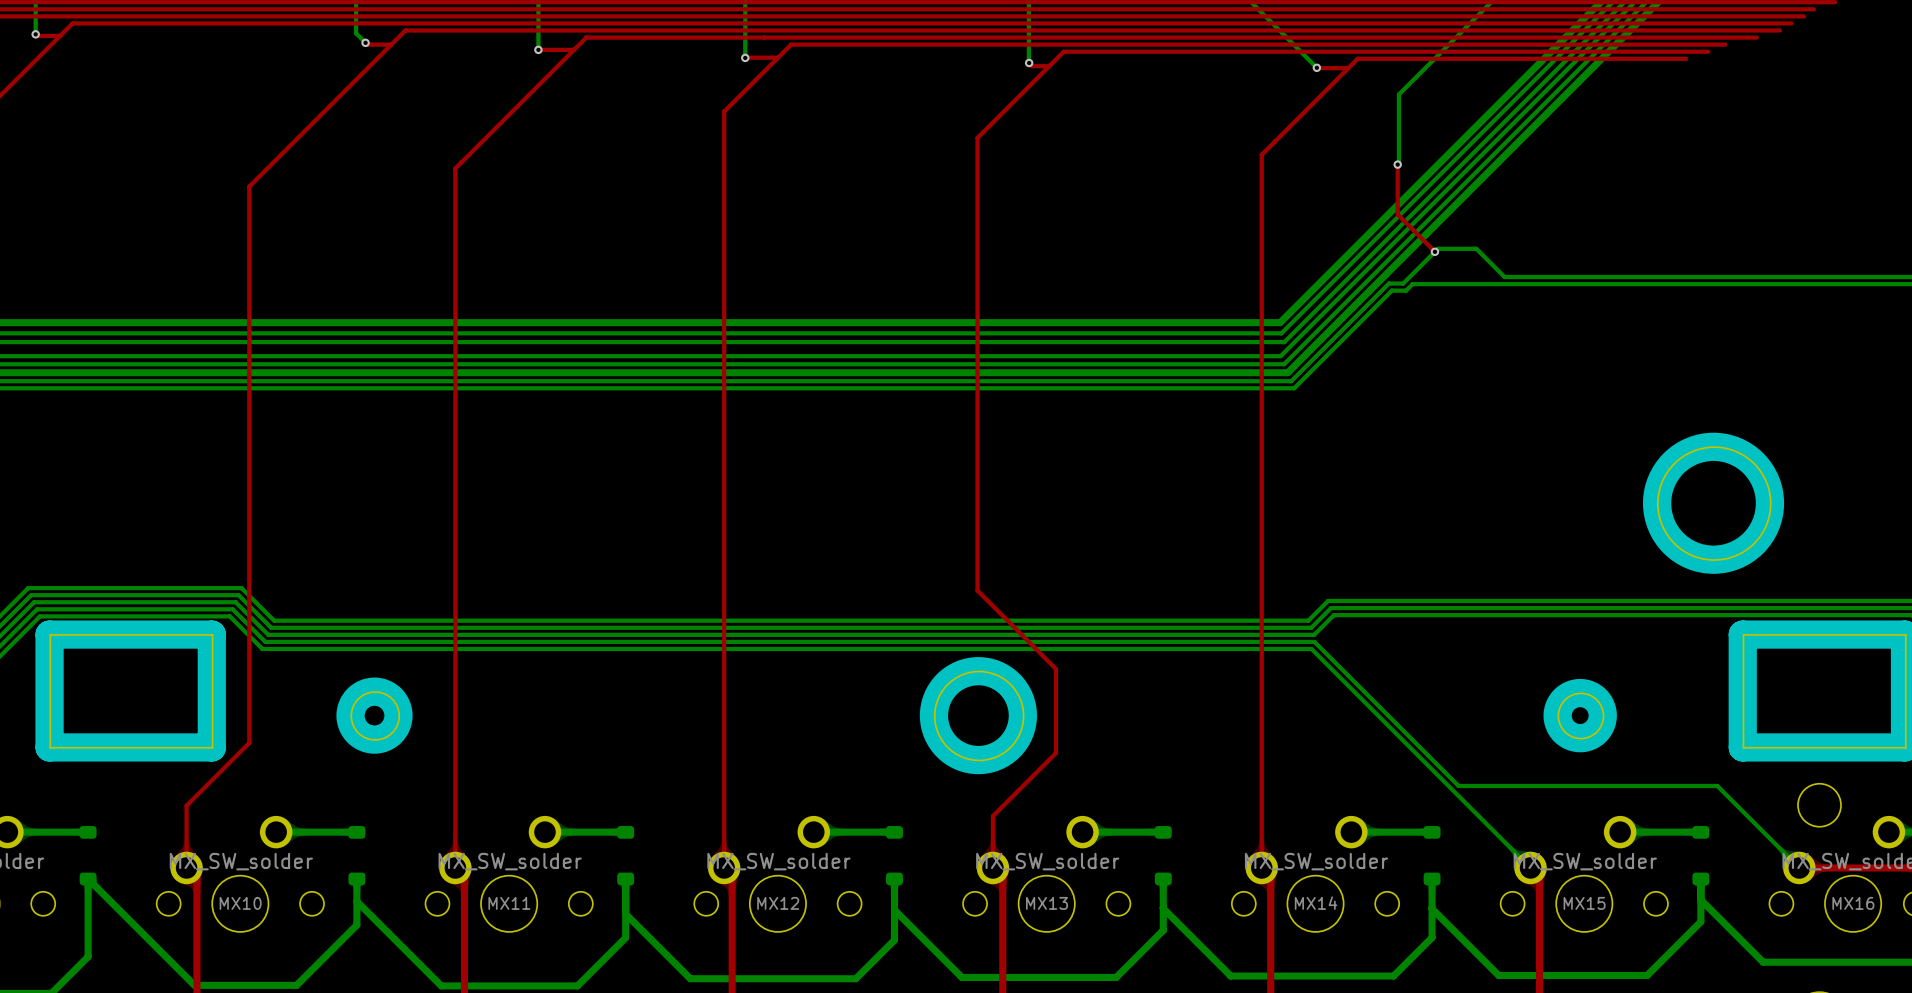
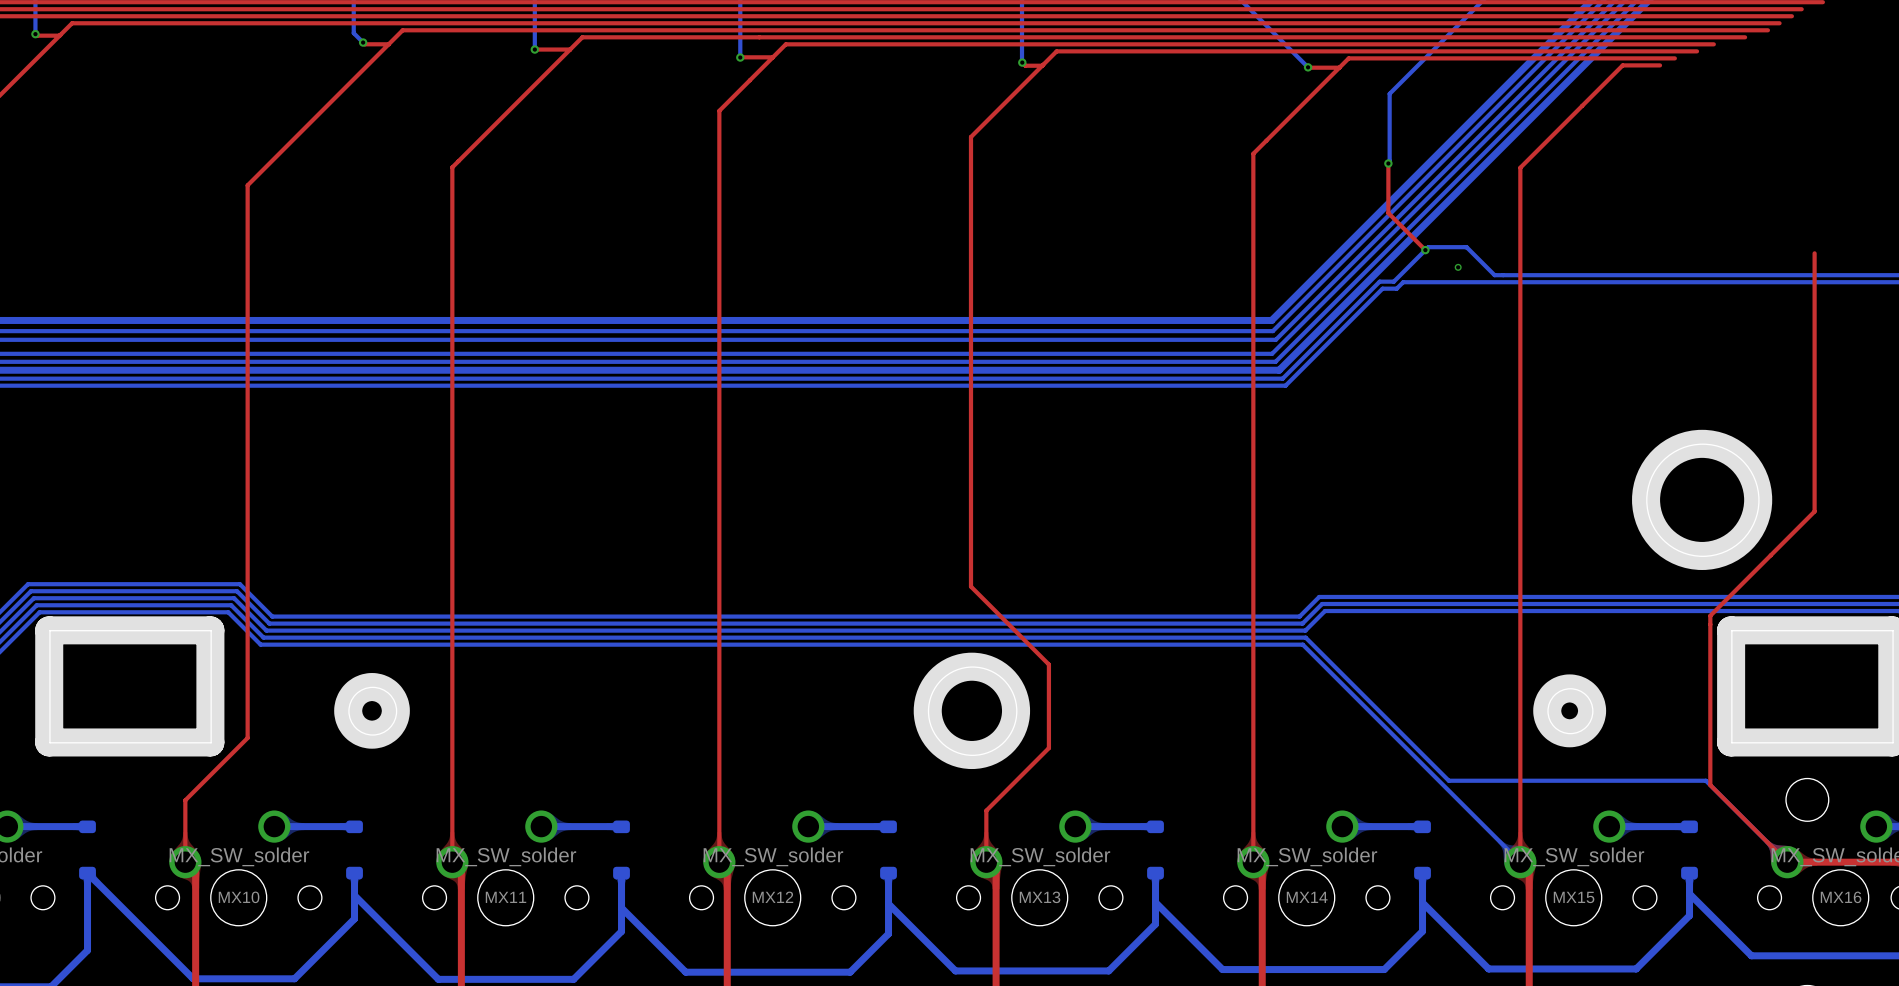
top track: none -> (1660, 65) (1622, 65) (1520, 167) (1520, 862)
top track: none -> (1814, 253) (1814, 511) (1710, 615) (1710, 785) (1787, 862)
via: none -> (1458, 267)

